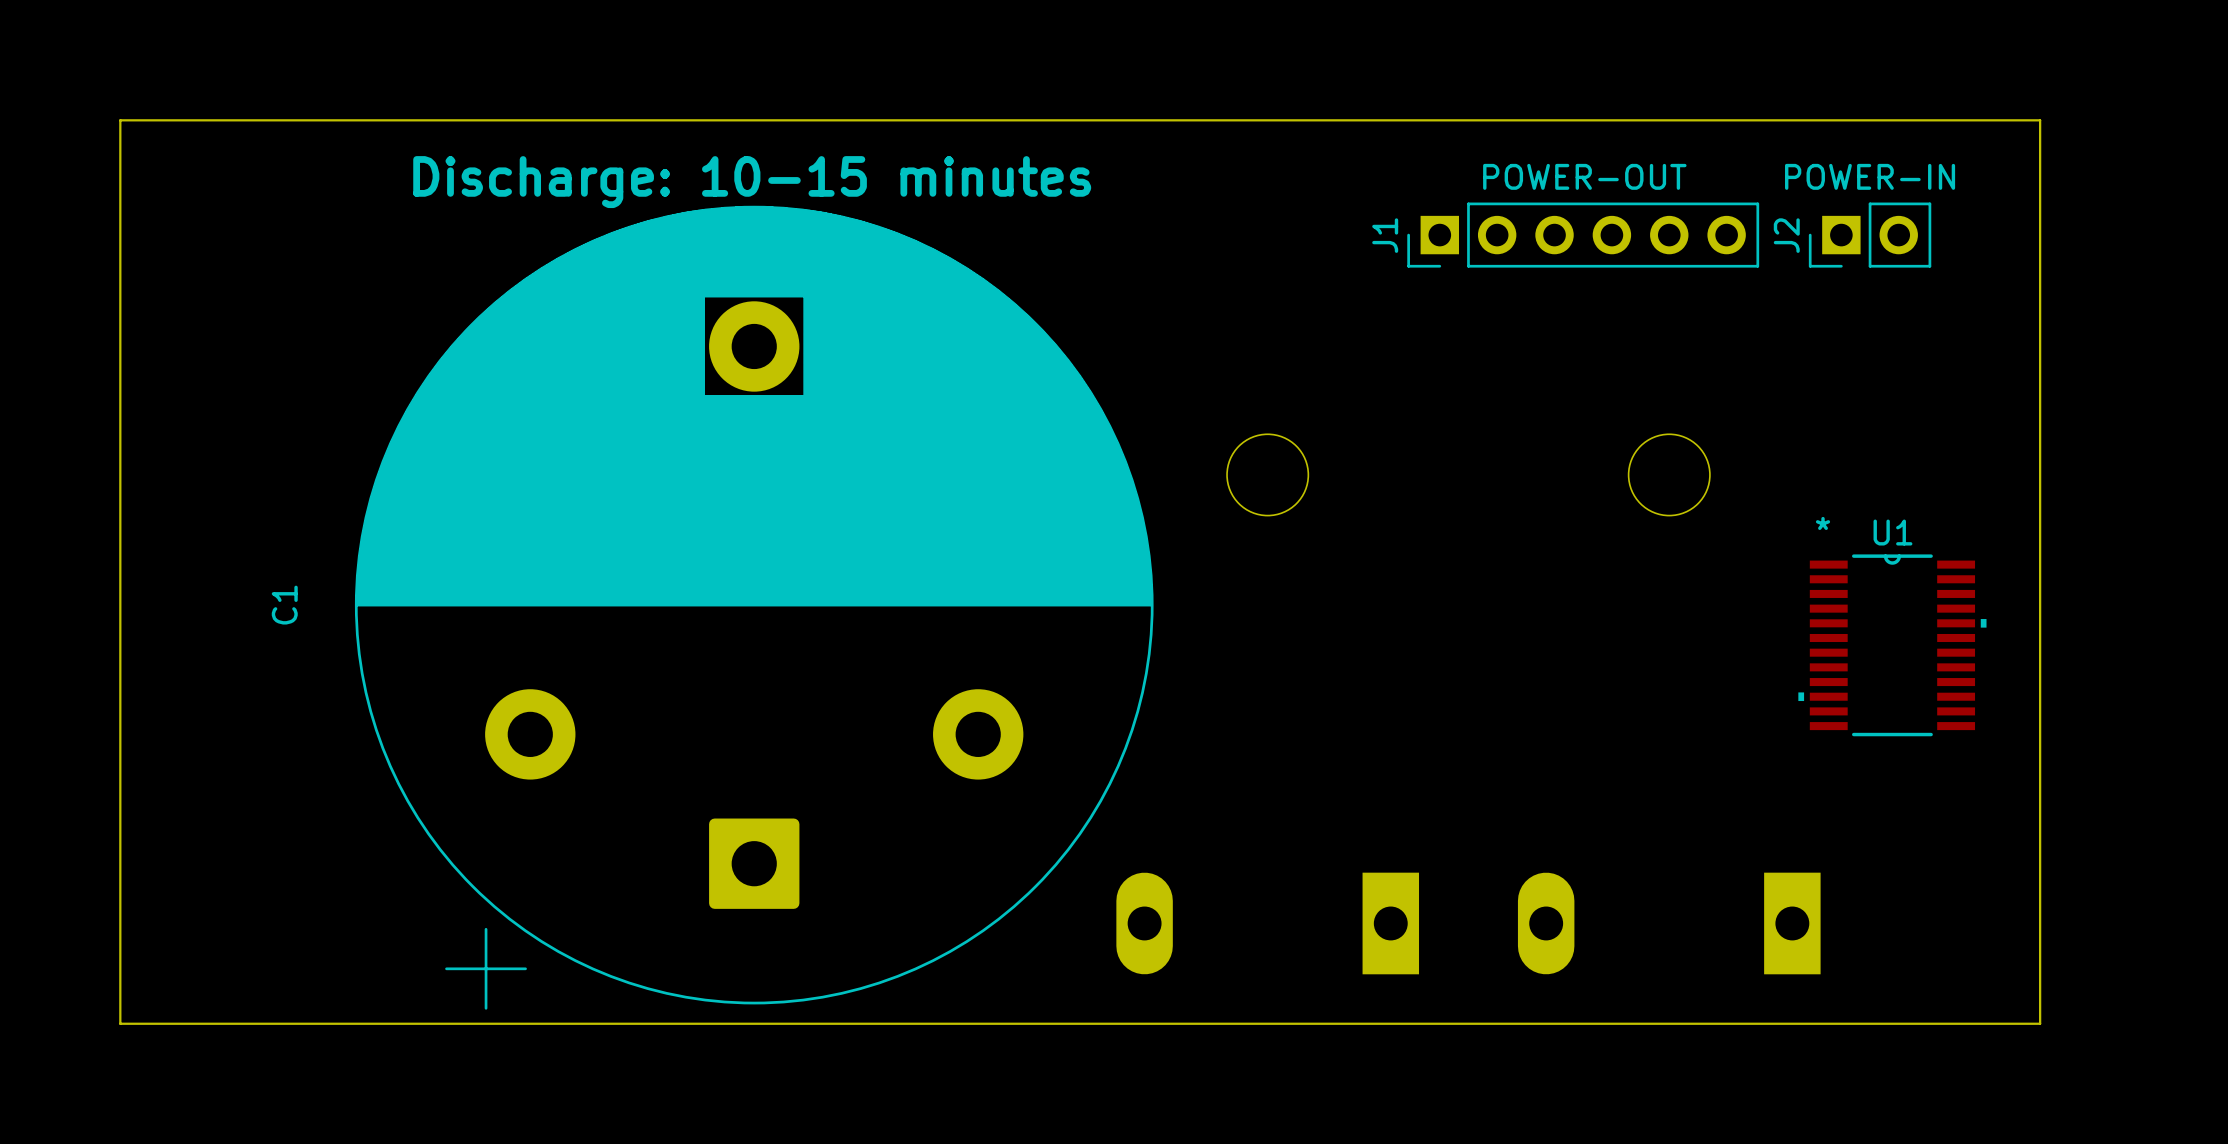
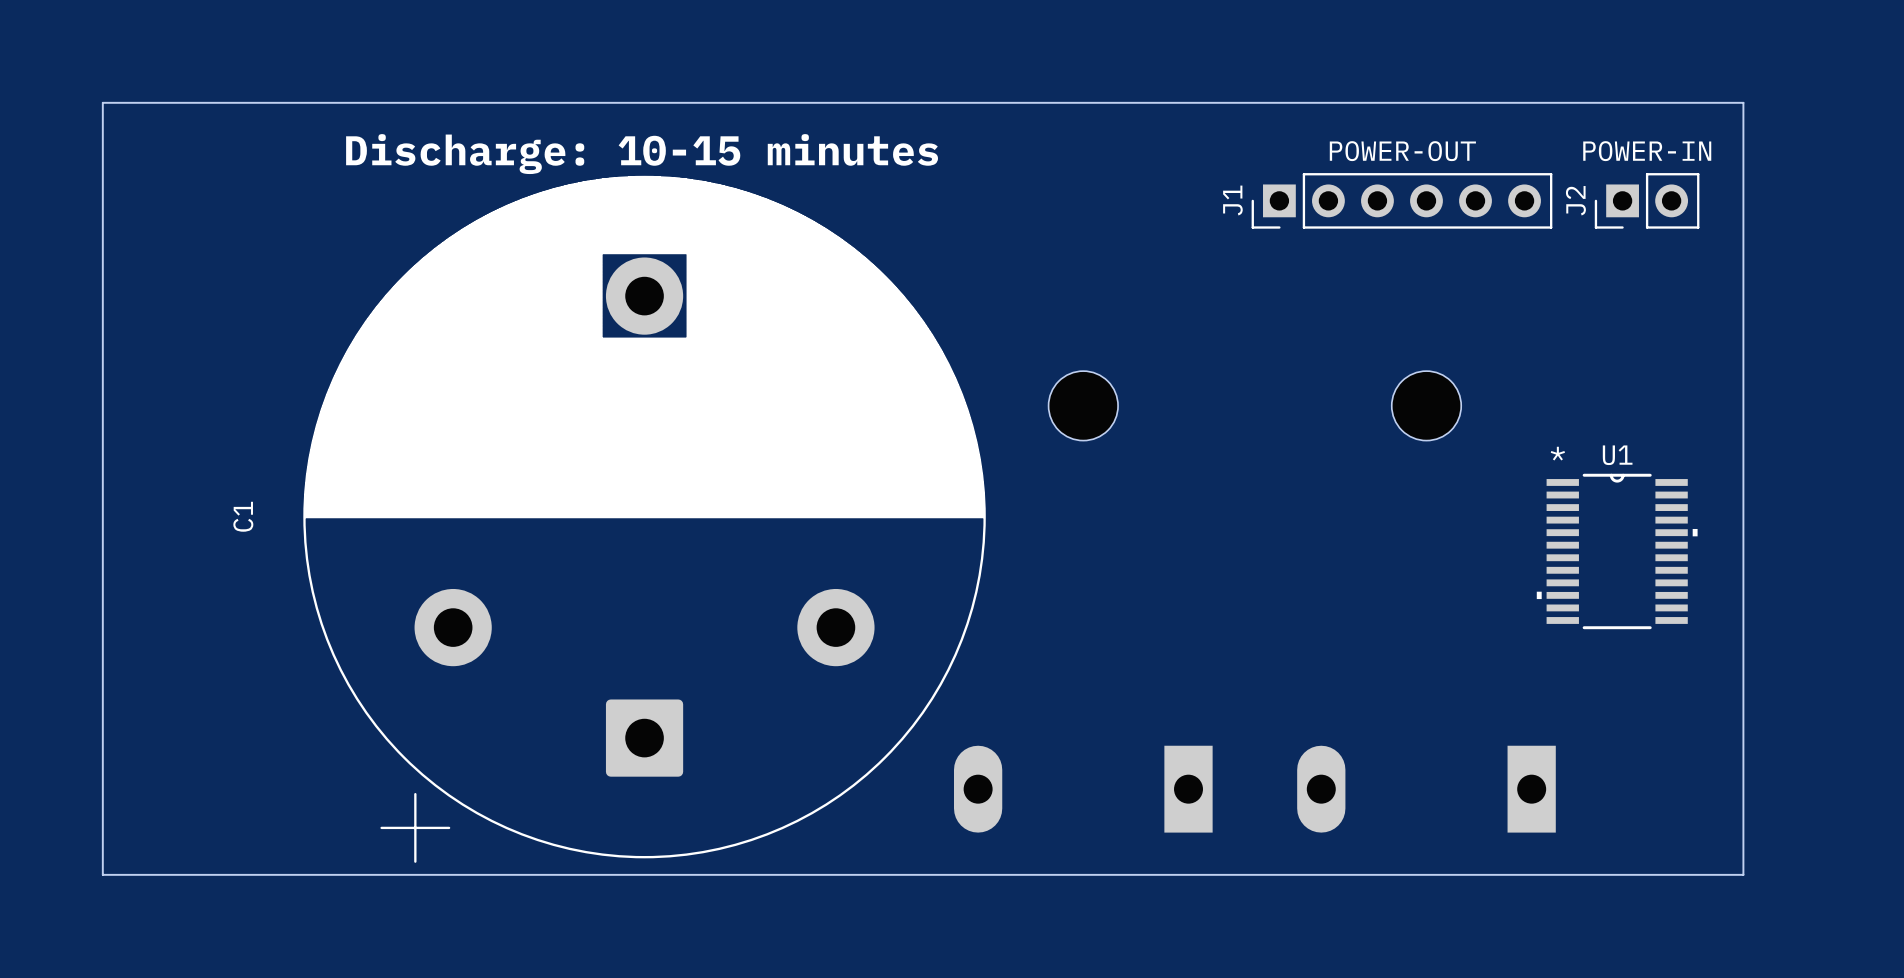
J1 position: (1583, 235) -> (1401, 200)
J2 position: (1870, 235) -> (1647, 200)

